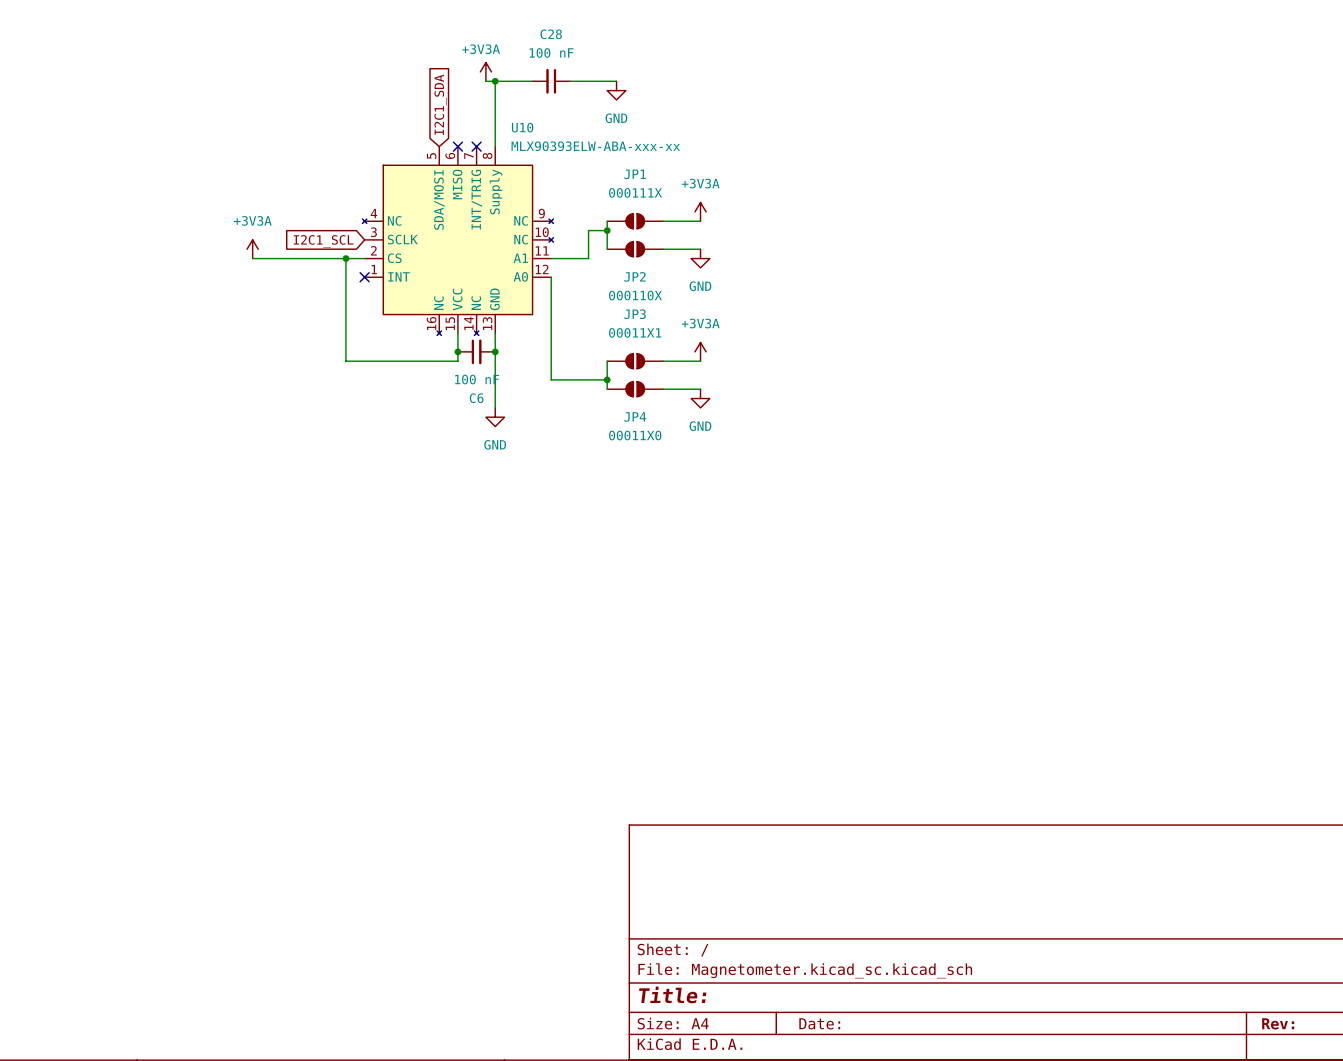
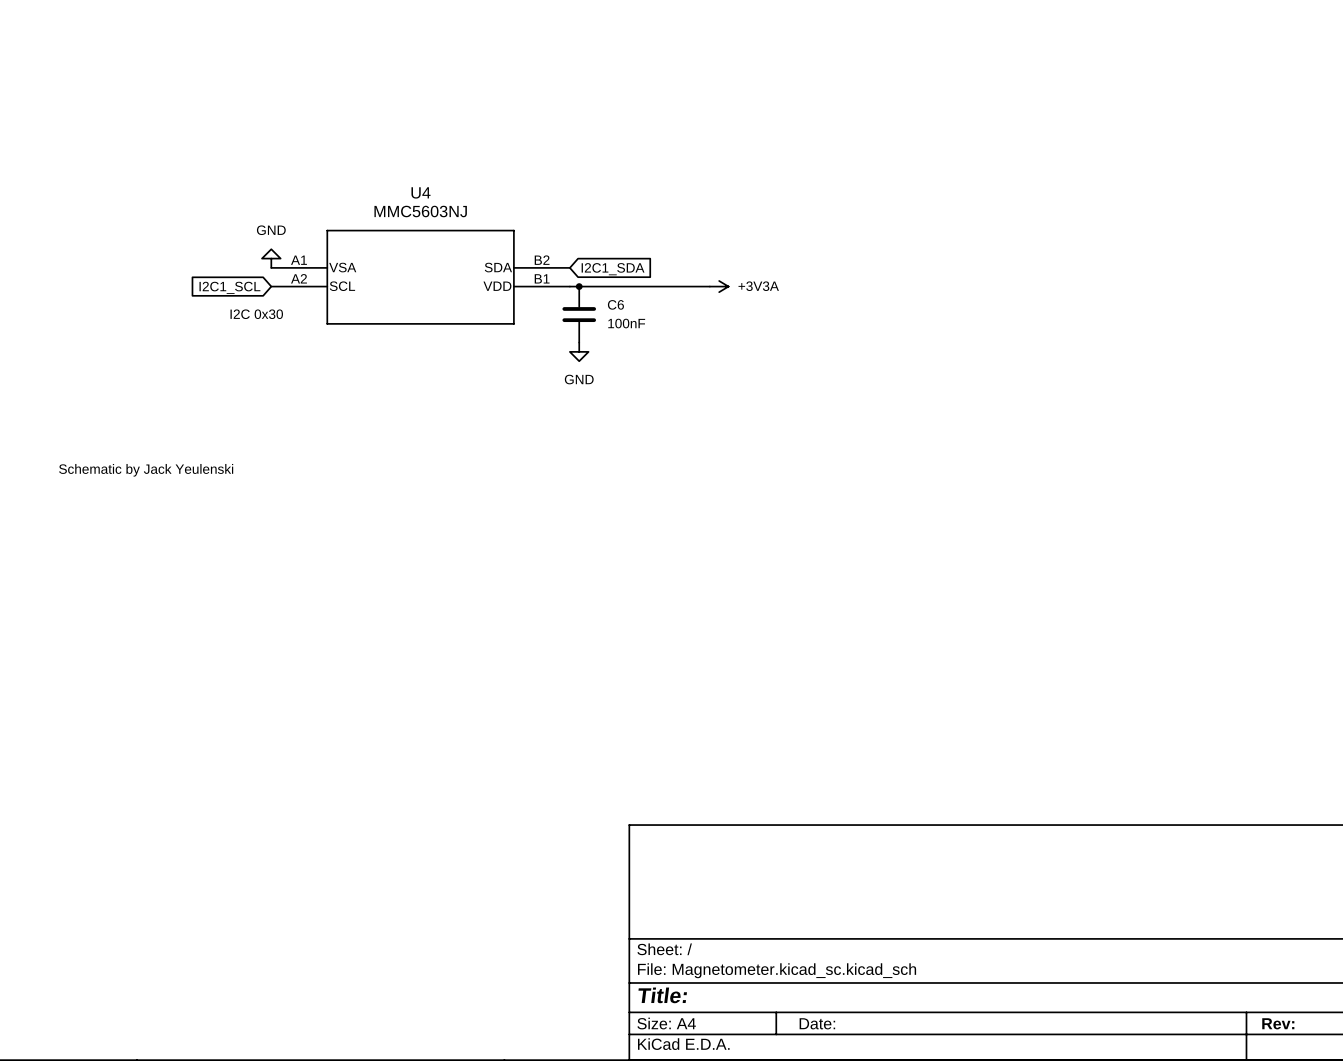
power symbol: +3V3A (485, 71) -> none
wire: (485, 81) (532, 81) -> none
wire: (495, 81) (495, 146) -> none
junction: (495, 81) -> none
C28: 100 nF (551, 81) -> none
wire: (569, 81) (616, 81) -> none
power symbol: GND (616, 90) -> none
global label rotation: 0° (440, 104) -> 90° clockwise (613, 269)
global label position: I2C1_SDA (440, 104) -> I2C1_SDA (613, 269)
no-connect mark: (457, 146) -> none
no-connect mark: (476, 146) -> none
power symbol: +3V3A (700, 211) -> none
wire: (607, 221) (607, 249) -> none
JP1: 000111X (635, 221) -> none
wire: (663, 221) (700, 221) -> none
wire: (607, 230) (588, 230) (588, 258) (551, 258) -> none
junction: (607, 230) -> none
global label position: I2C1_SCL (323, 241) -> I2C1_SCL (229, 287)
U10: MLX90393ELW-ABA-xxx-xx (457, 241) -> none
power symbol: +3V3A (252, 249) -> none
JP2: 000110X (635, 249) -> none
wire: (663, 249) (700, 249) -> none
wire: (252, 258) (364, 258) -> none
power symbol: none -> GND (271, 258)
wire: (345, 258) (345, 361) (457, 361) (457, 333) -> none
junction: (345, 258) -> none
power symbol: GND (700, 258) -> none
no-connect mark: (364, 277) -> none
U4: none -> MMC5603NJ (420, 277)
wire: (551, 277) (551, 379) (607, 379) -> none
wire: none -> (569, 286) (709, 286)
junction: none -> (579, 286)
power symbol: none -> +3V3A (719, 286)
text: none -> I2C 0x30 (256, 314)
wire: (495, 333) (495, 407) -> none
C6 symbol: [457, 339, 496, 365] -> [562, 286, 597, 343]
junction: (457, 351) -> none
junction: (495, 351) -> none
power symbol: none -> GND (579, 351)
power symbol: +3V3A (700, 351) -> none
wire: (607, 361) (607, 389) -> none
JP3: 00011X1 (635, 361) -> none
wire: (663, 361) (700, 361) -> none
C6 value: 100 nF (477, 379) -> 100nF (626, 323)
junction: (607, 379) -> none
JP4: 00011X0 (635, 389) -> none
wire: (663, 389) (700, 389) -> none
C6 name position: C6 (476, 398) -> C6 (615, 304)
power symbol: GND (700, 398) -> none
power symbol: GND (495, 417) -> none
text: none -> Schematic by Jack Yeulenski (146, 470)

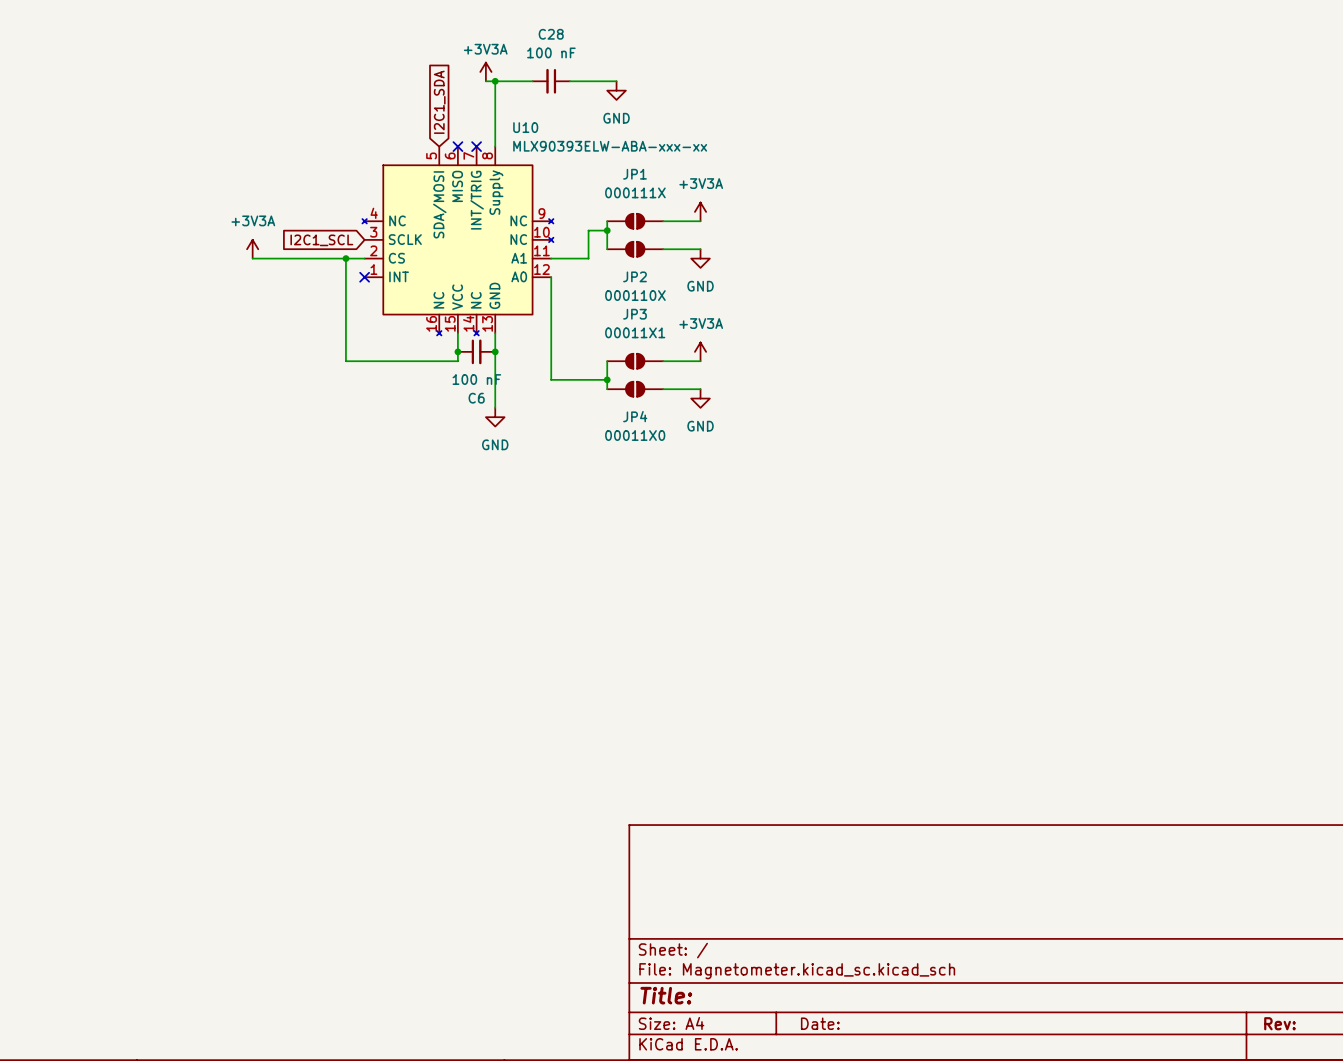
power symbol: none -> +3V3A (485, 71)
wire: none -> (485, 81) (532, 81)
wire: none -> (495, 81) (495, 146)
junction: none -> (495, 81)
C28: none -> 100 nF (551, 81)
wire: none -> (569, 81) (616, 81)
power symbol: none -> GND (616, 90)
no-connect mark: none -> (457, 146)
no-connect mark: none -> (476, 146)
power symbol: none -> +3V3A (700, 211)
wire: none -> (607, 221) (607, 249)
JP1: none -> 000111X (635, 221)
wire: none -> (663, 221) (700, 221)
wire: none -> (607, 230) (588, 230) (588, 258) (551, 258)
junction: none -> (607, 230)
U10: none -> MLX90393ELW-ABA-xxx-xx (457, 241)
power symbol: none -> +3V3A (252, 249)
JP2: none -> 000110X (635, 249)
wire: none -> (663, 249) (700, 249)
wire: none -> (252, 258) (364, 258)
power symbol: GND (271, 258) -> none
wire: none -> (345, 258) (345, 361) (457, 361) (457, 333)
junction: none -> (345, 258)
power symbol: none -> GND (700, 258)
global label rotation: 0° (613, 269) -> 90° counterclockwise (439, 102)
global label position: I2C1_SDA (613, 269) -> I2C1_SDA (439, 102)
no-connect mark: none -> (364, 277)
U4: MMC5603NJ (420, 277) -> none
wire: none -> (551, 277) (551, 379) (607, 379)
C6 symbol: [562, 286, 597, 343] -> [457, 339, 496, 365]
wire: (569, 286) (709, 286) -> none
junction: (579, 286) -> none
power symbol: +3V3A (719, 286) -> none
global label position: I2C1_SCL (229, 287) -> I2C1_SCL (321, 240)
C6 name position: C6 (615, 304) -> C6 (476, 398)
text: I2C 0x30 (256, 314) -> none
C6 value: 100nF (626, 323) -> 100 nF (476, 379)
wire: none -> (495, 333) (495, 407)
junction: none -> (457, 351)
junction: none -> (495, 351)
power symbol: GND (579, 351) -> none
power symbol: none -> +3V3A (700, 351)
wire: none -> (607, 361) (607, 389)
JP3: none -> 00011X1 (635, 361)
wire: none -> (663, 361) (700, 361)
junction: none -> (607, 379)
JP4: none -> 00011X0 (635, 389)
wire: none -> (663, 389) (700, 389)
power symbol: none -> GND (700, 398)
power symbol: none -> GND (495, 417)
text: Schematic by Jack Yeulenski (146, 470) -> none

